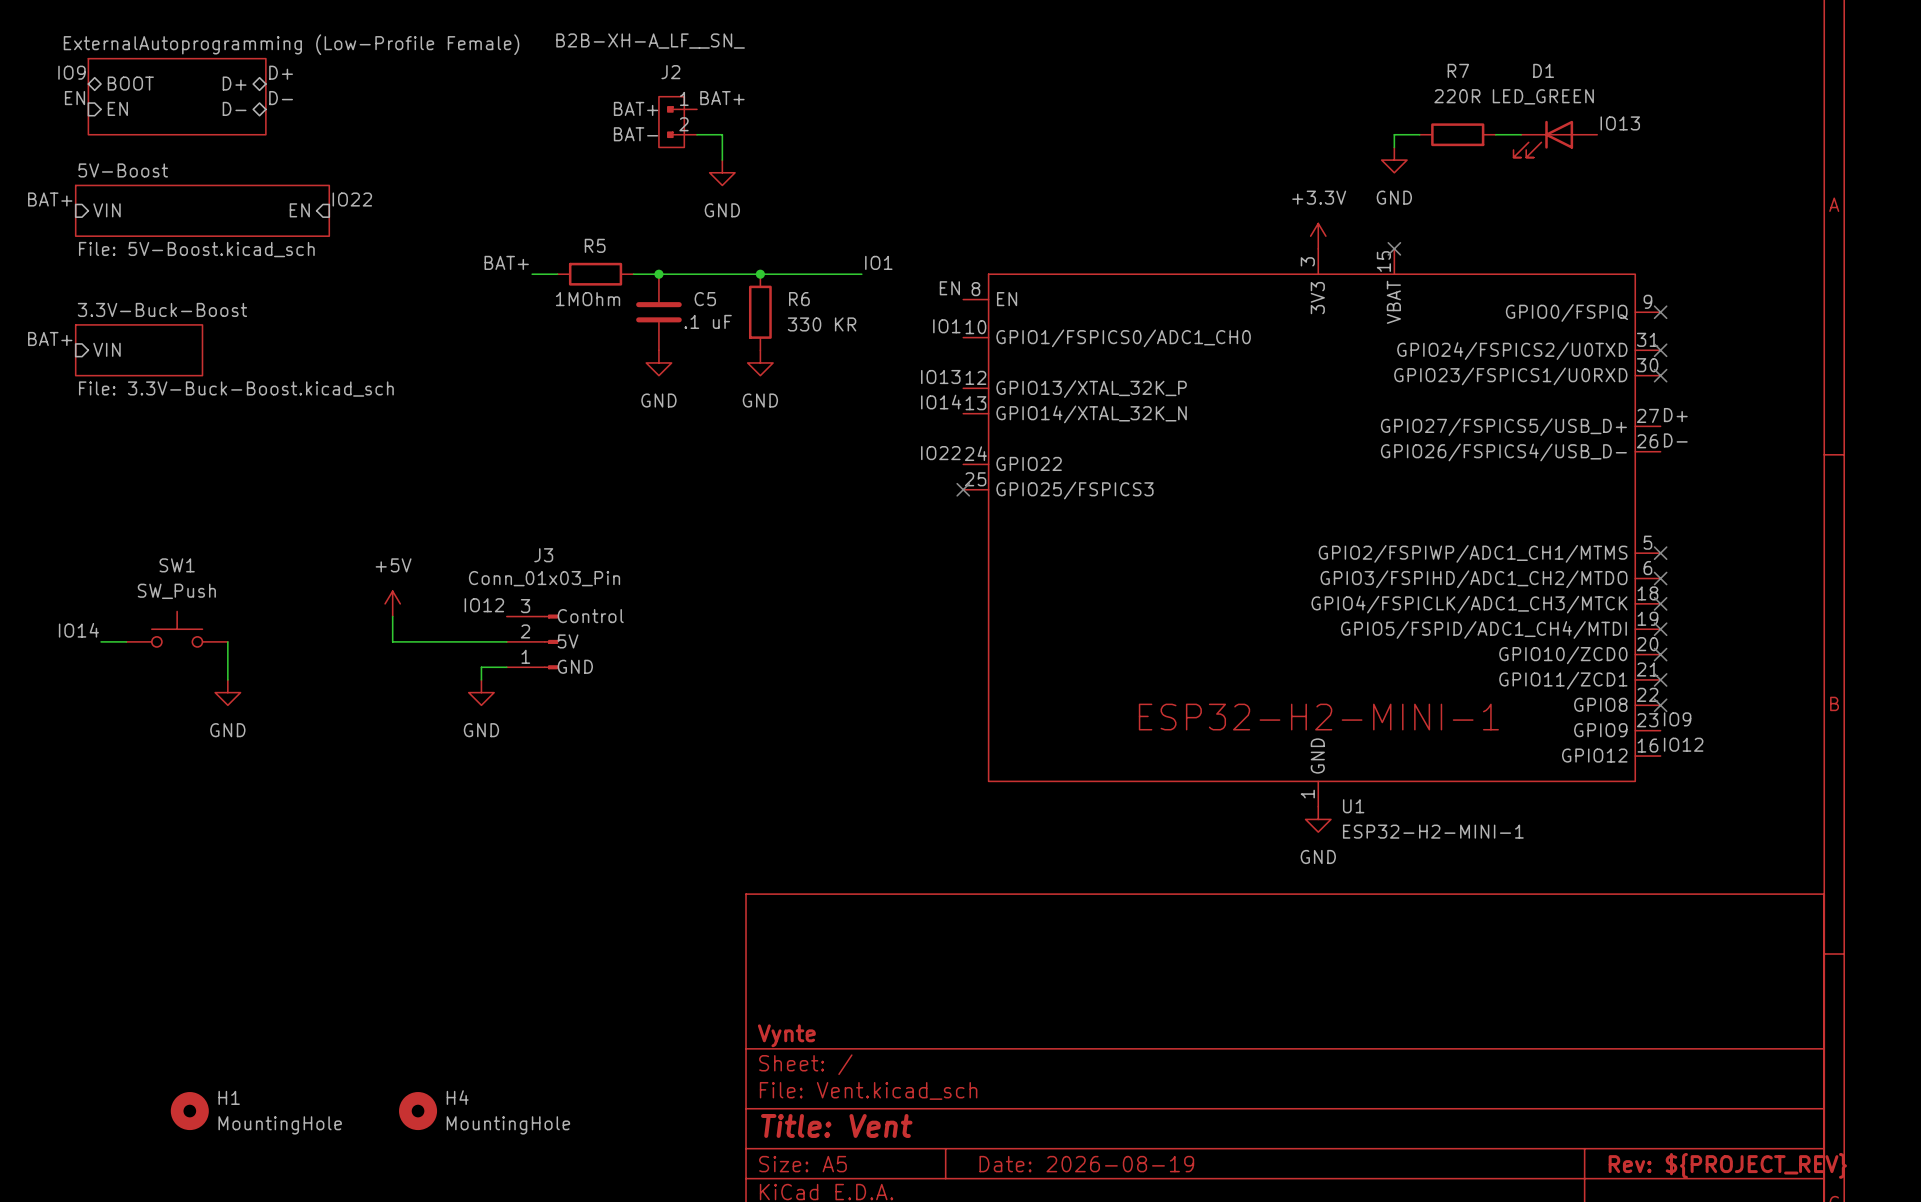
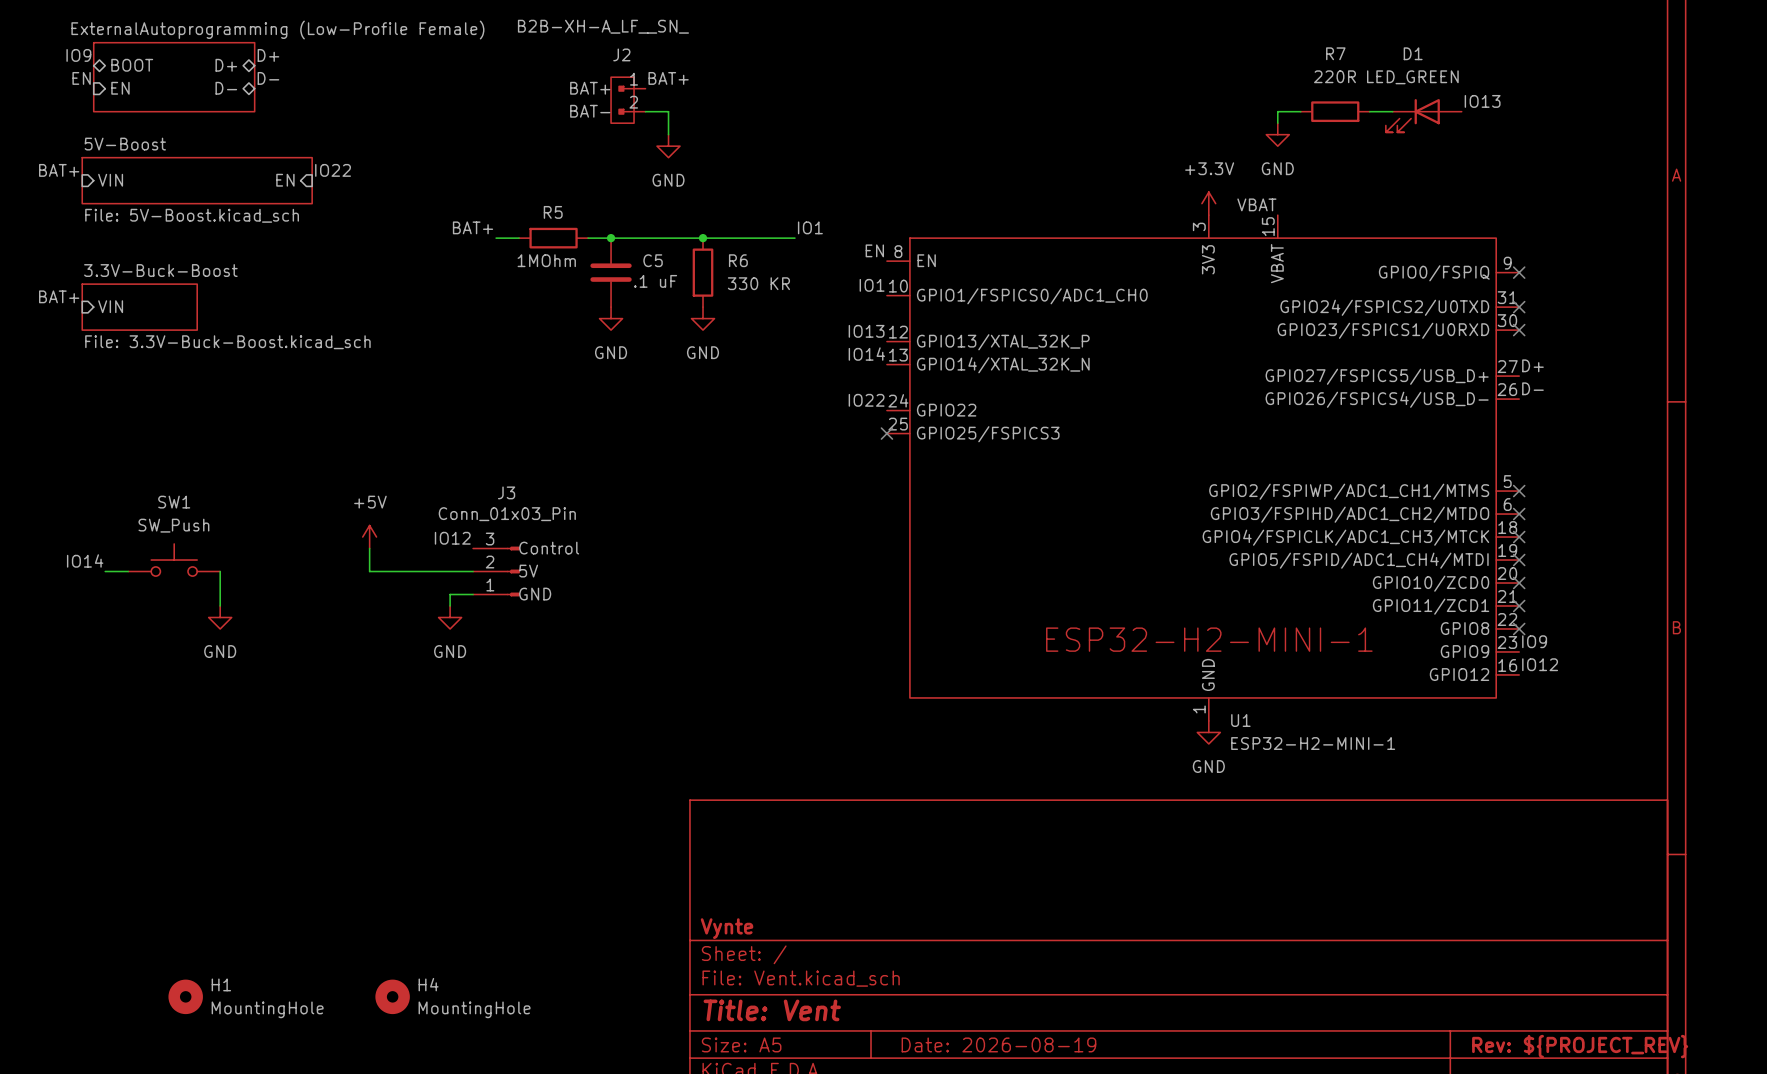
label: none -> VBAT (1256, 204)
no-connect mark: (1394, 248) -> none

